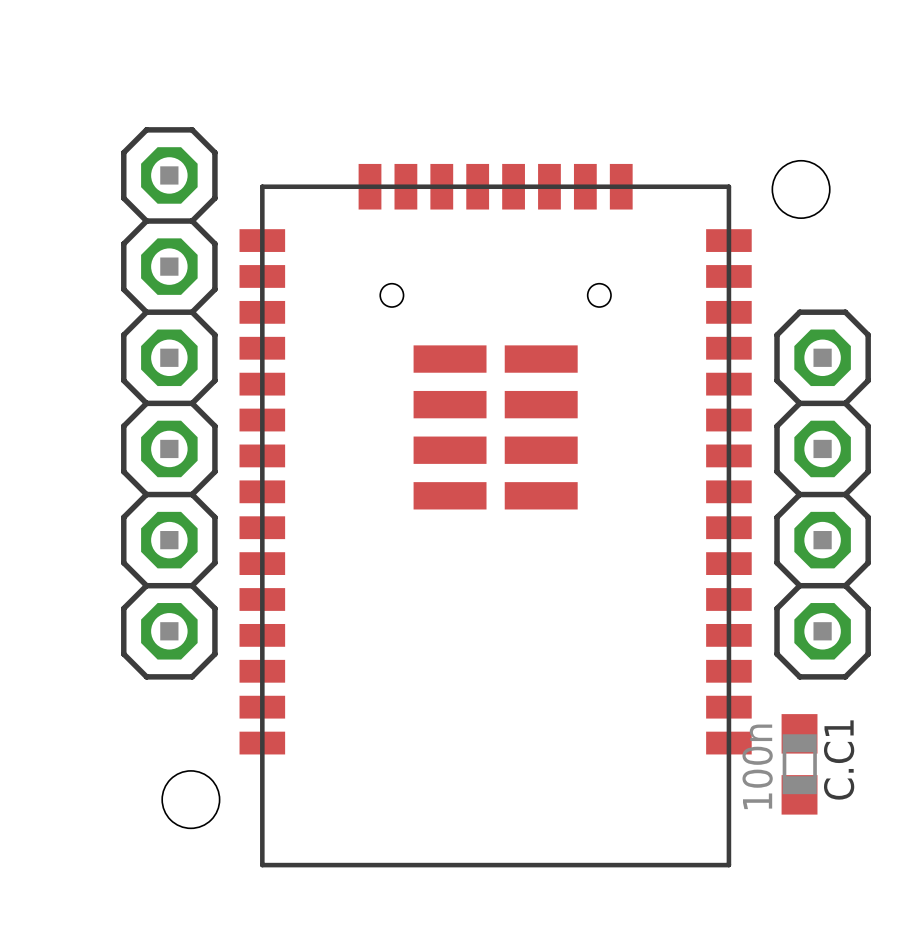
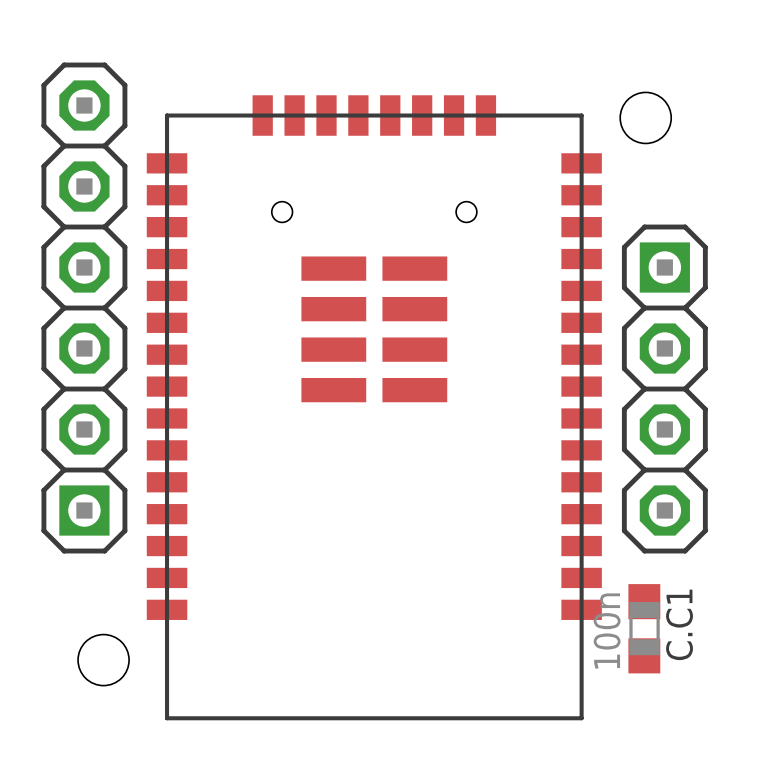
part footprint: [121, 127, 218, 680] -> [41, 62, 128, 554]
part footprint: [774, 309, 871, 680] -> [621, 224, 708, 554]

